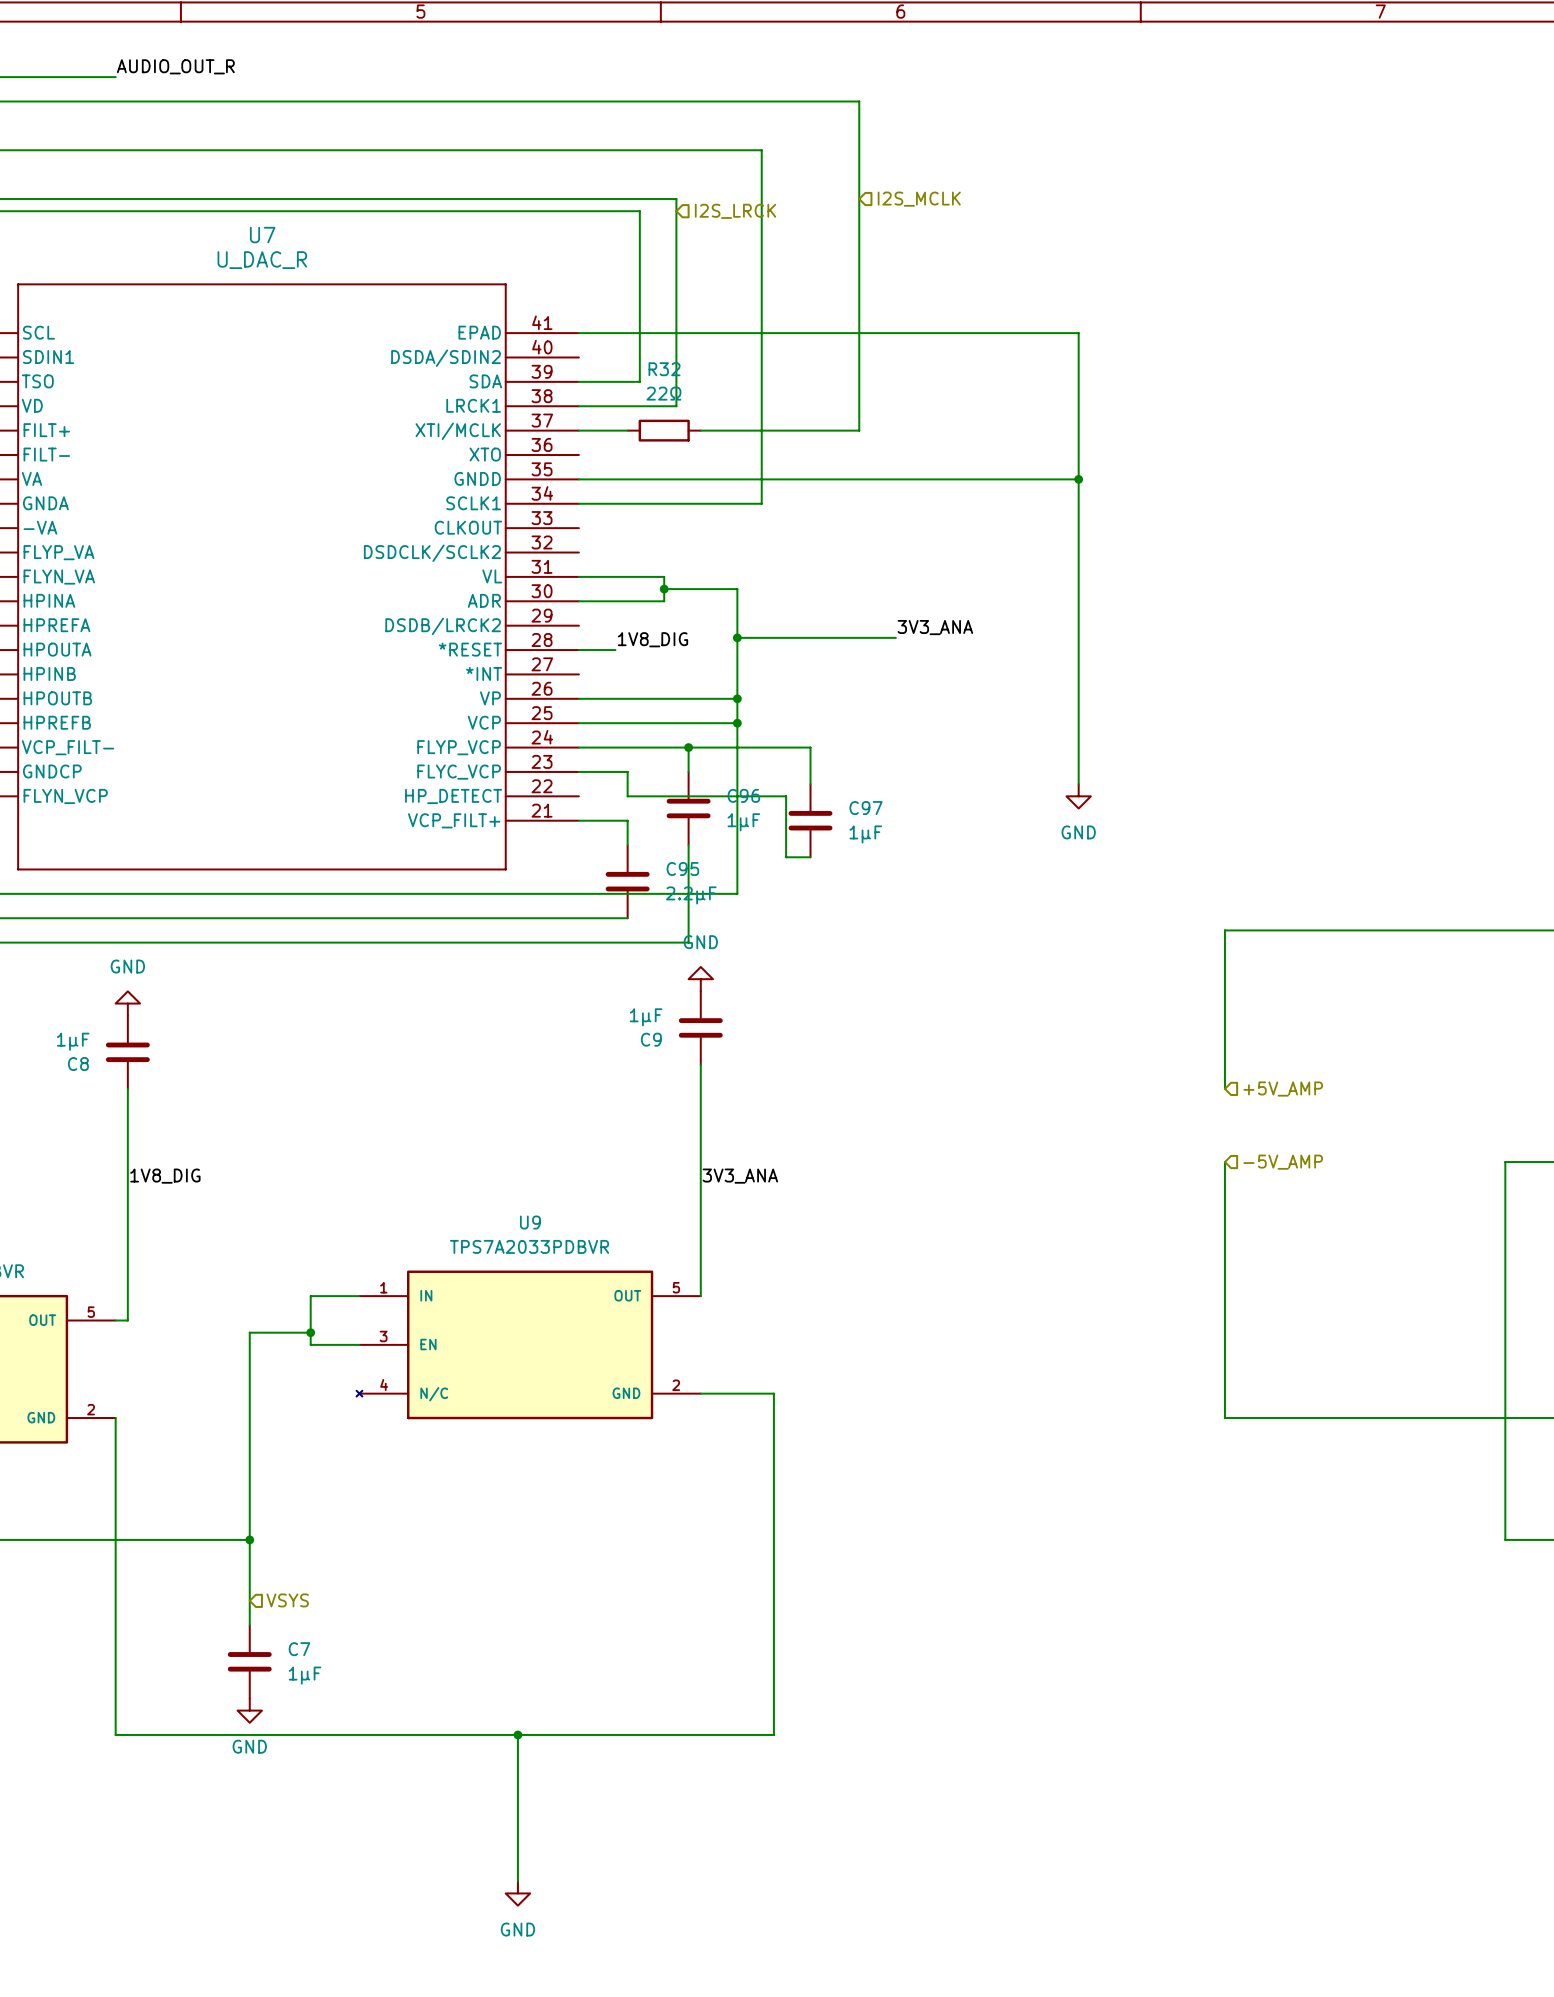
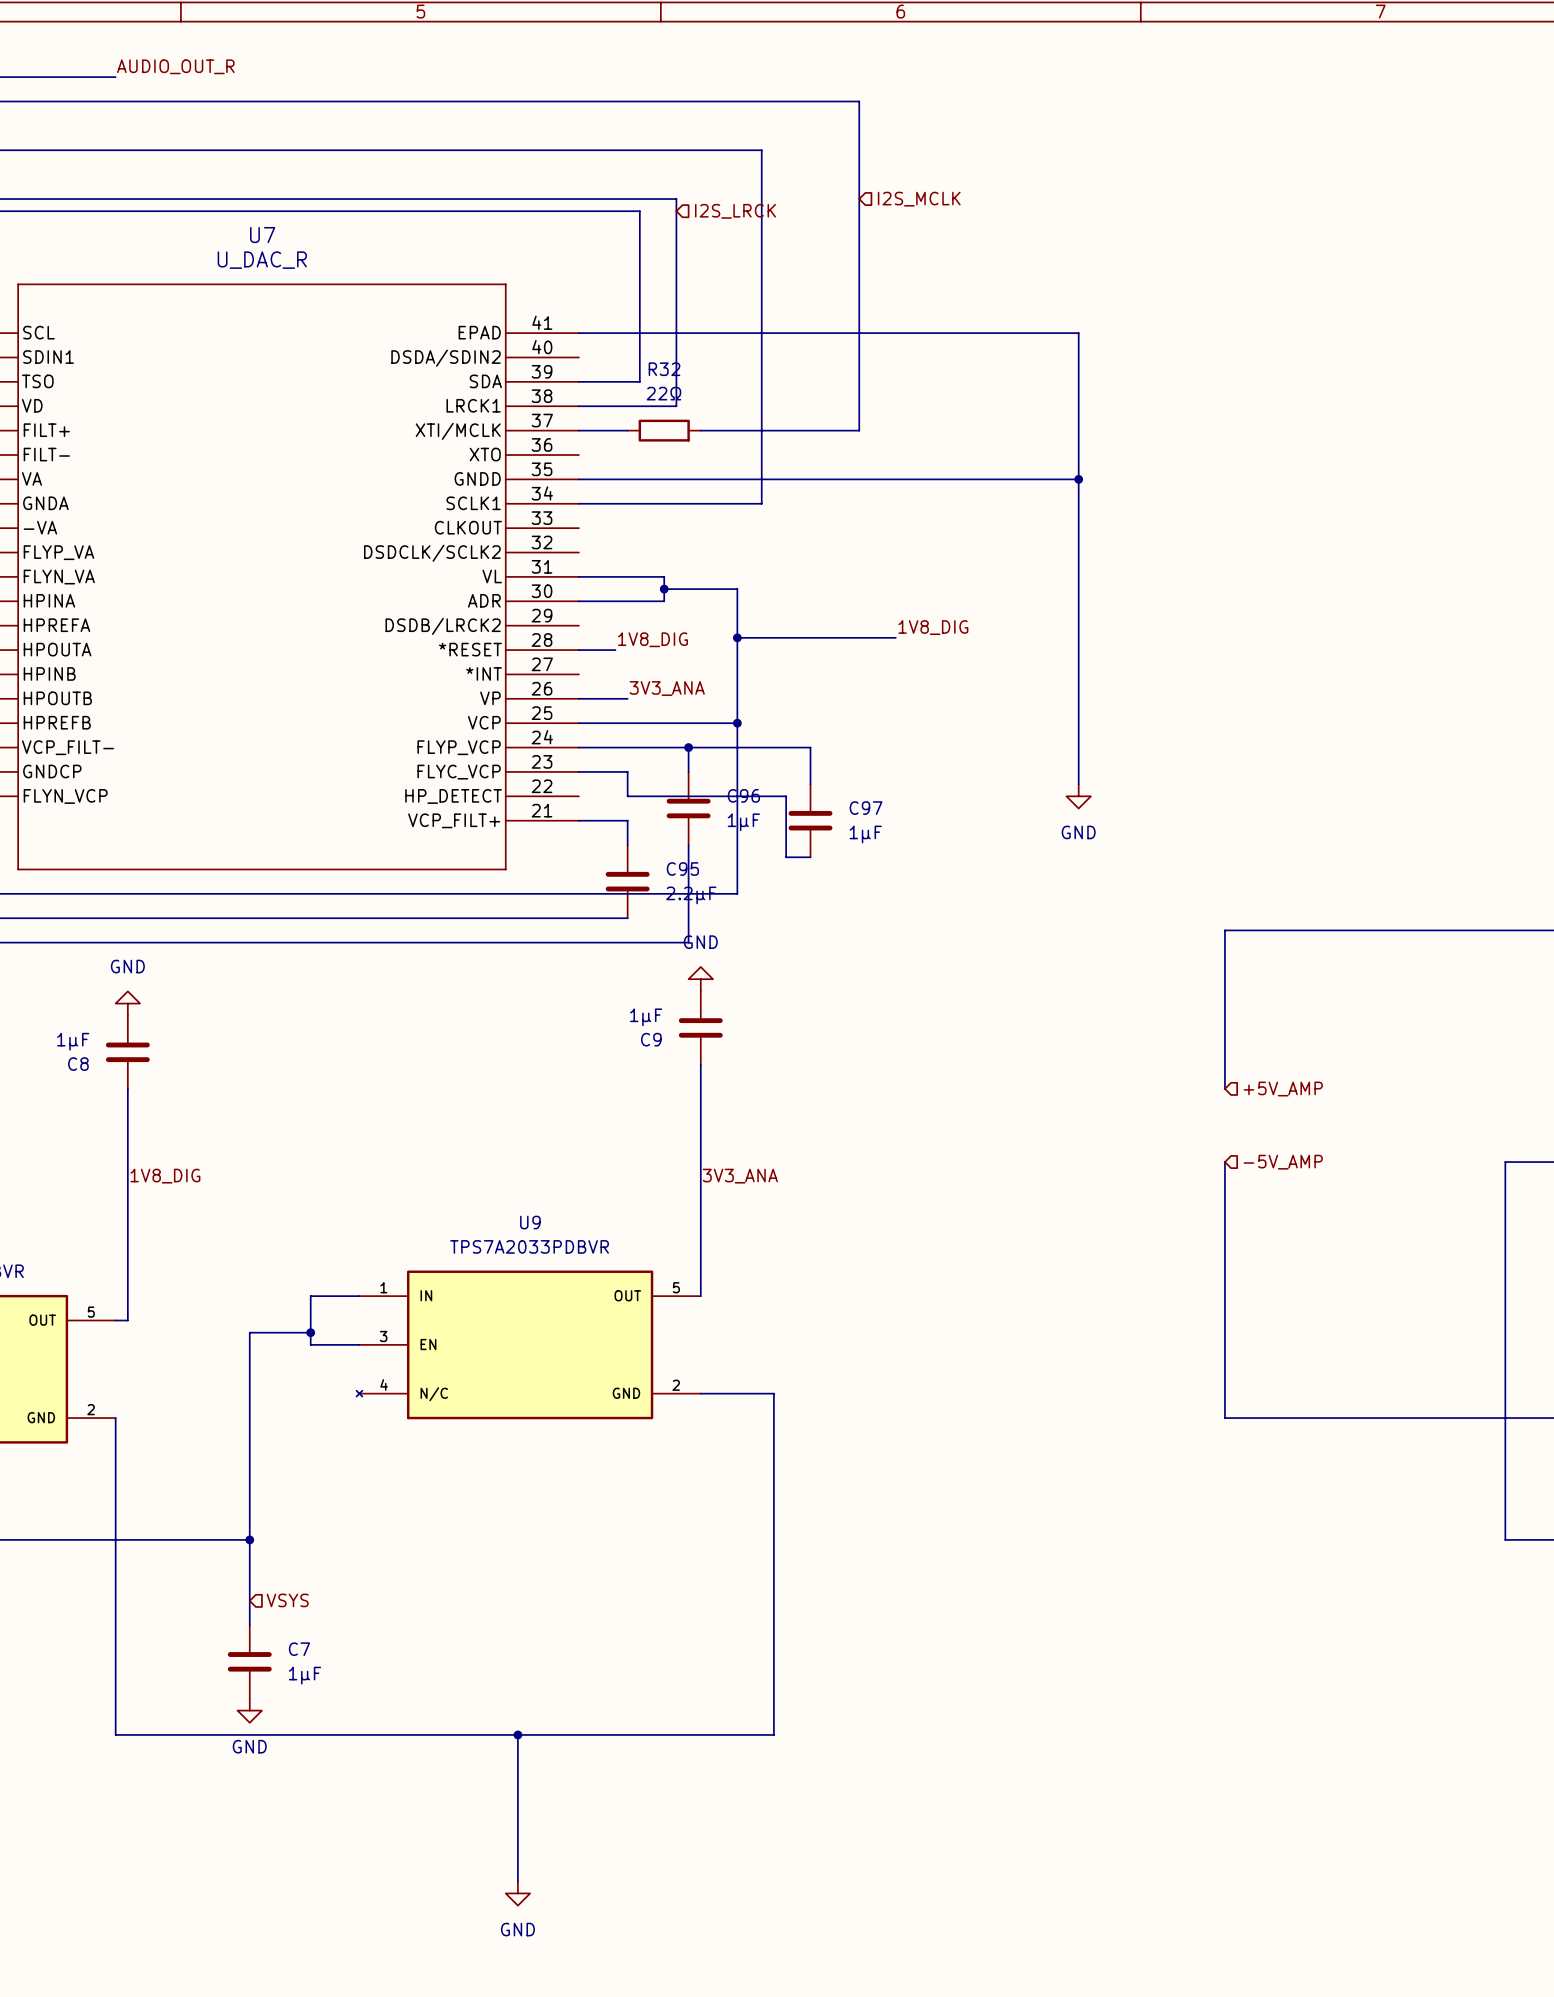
label: 3V3_ANA (935, 627) -> 1V8_DIG (933, 627)
label: none -> 3V3_ANA (667, 688)
wire: (627, 698) (737, 698) -> none
junction: (737, 698) -> none

